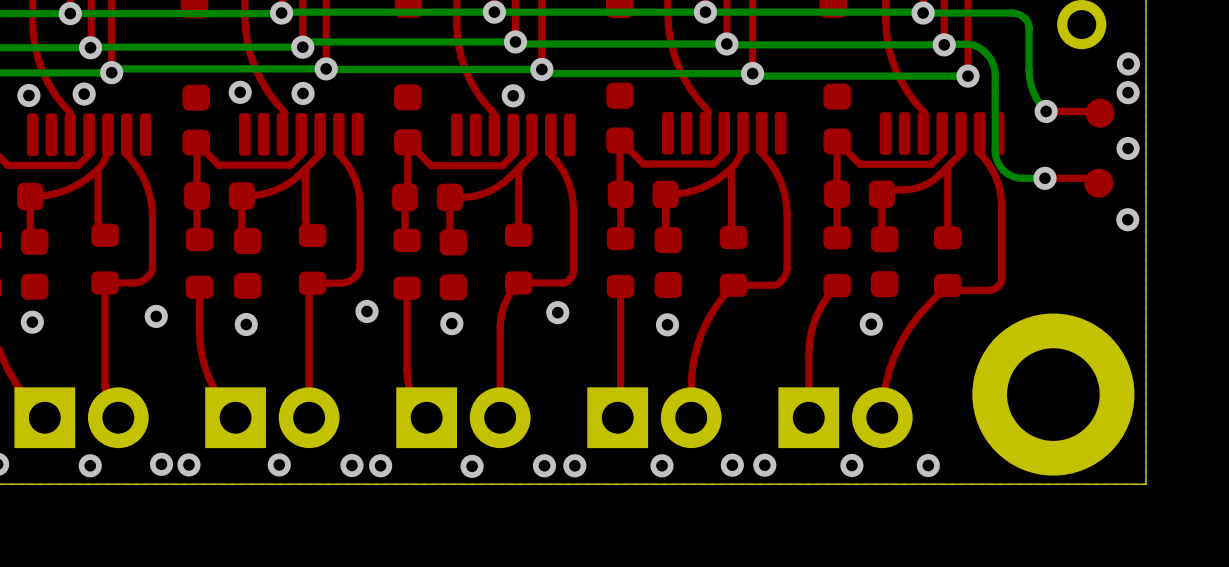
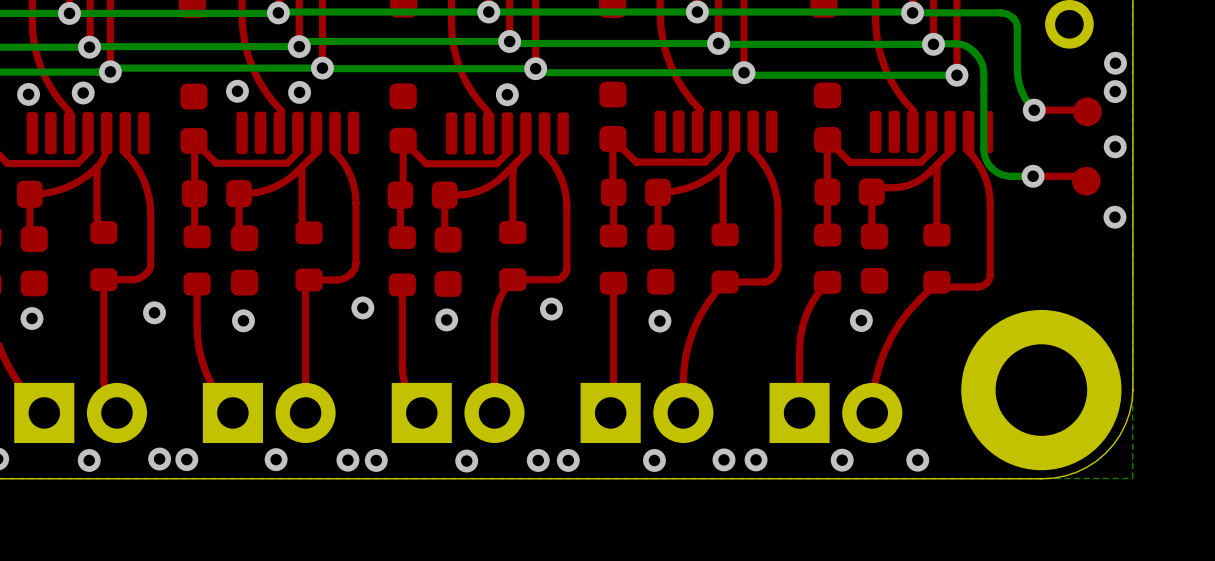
board edge: (1146, 394) (1146, 484) (1053, 484) -> (1132, 390) (1129, 413) (1125, 424) (1120, 434) (1105, 453) (1086, 467) (1075, 472) (1064, 476) (1041, 478)

